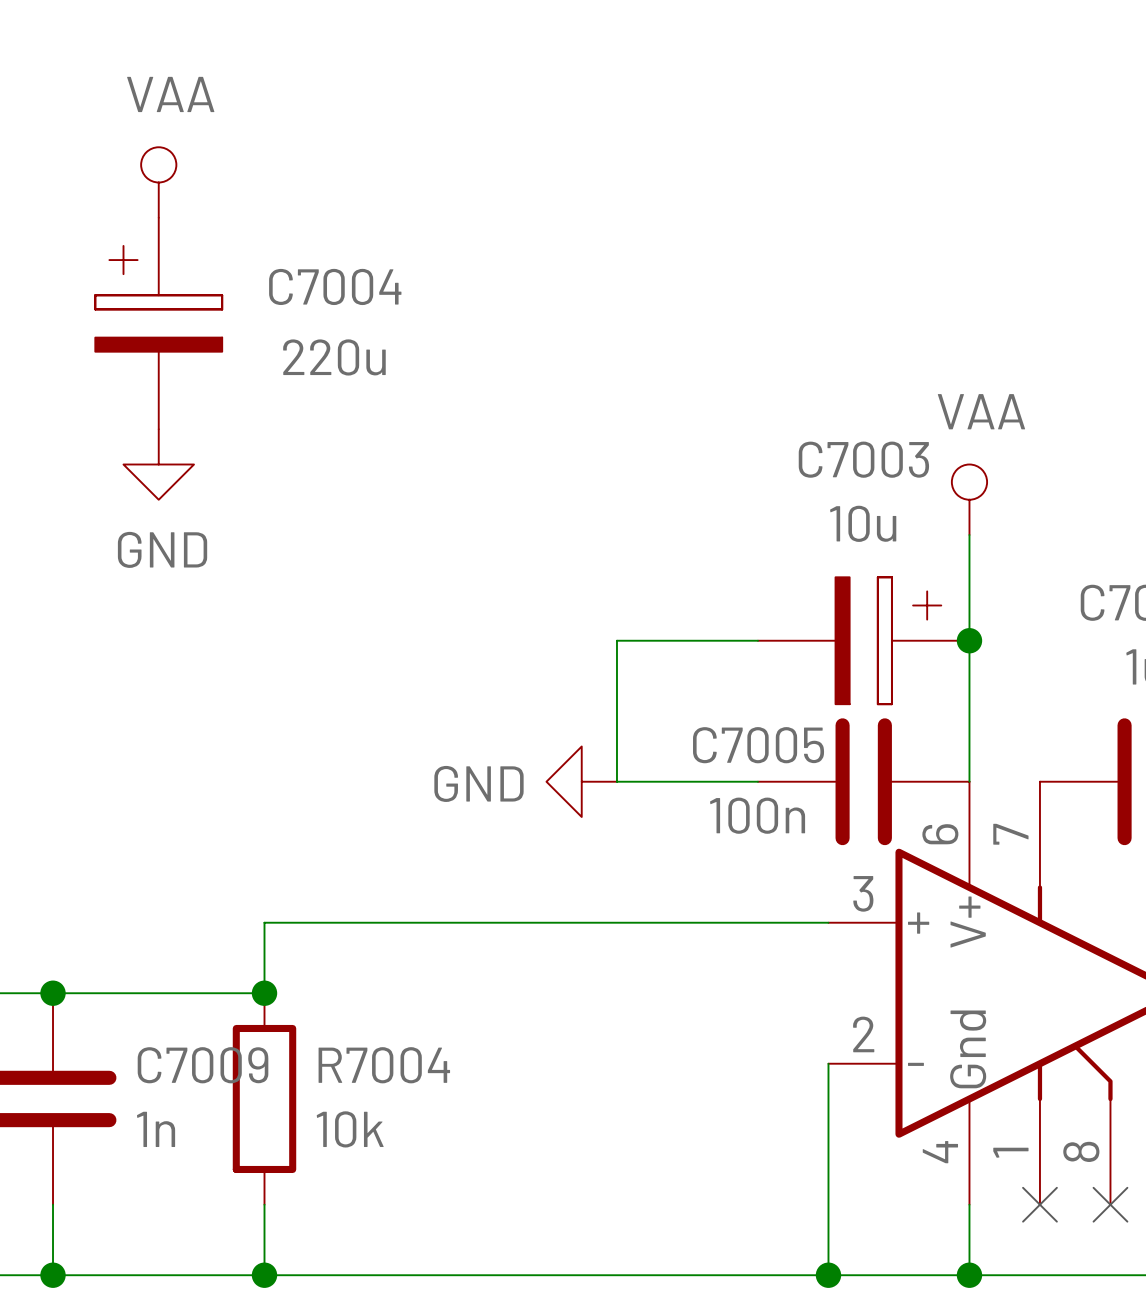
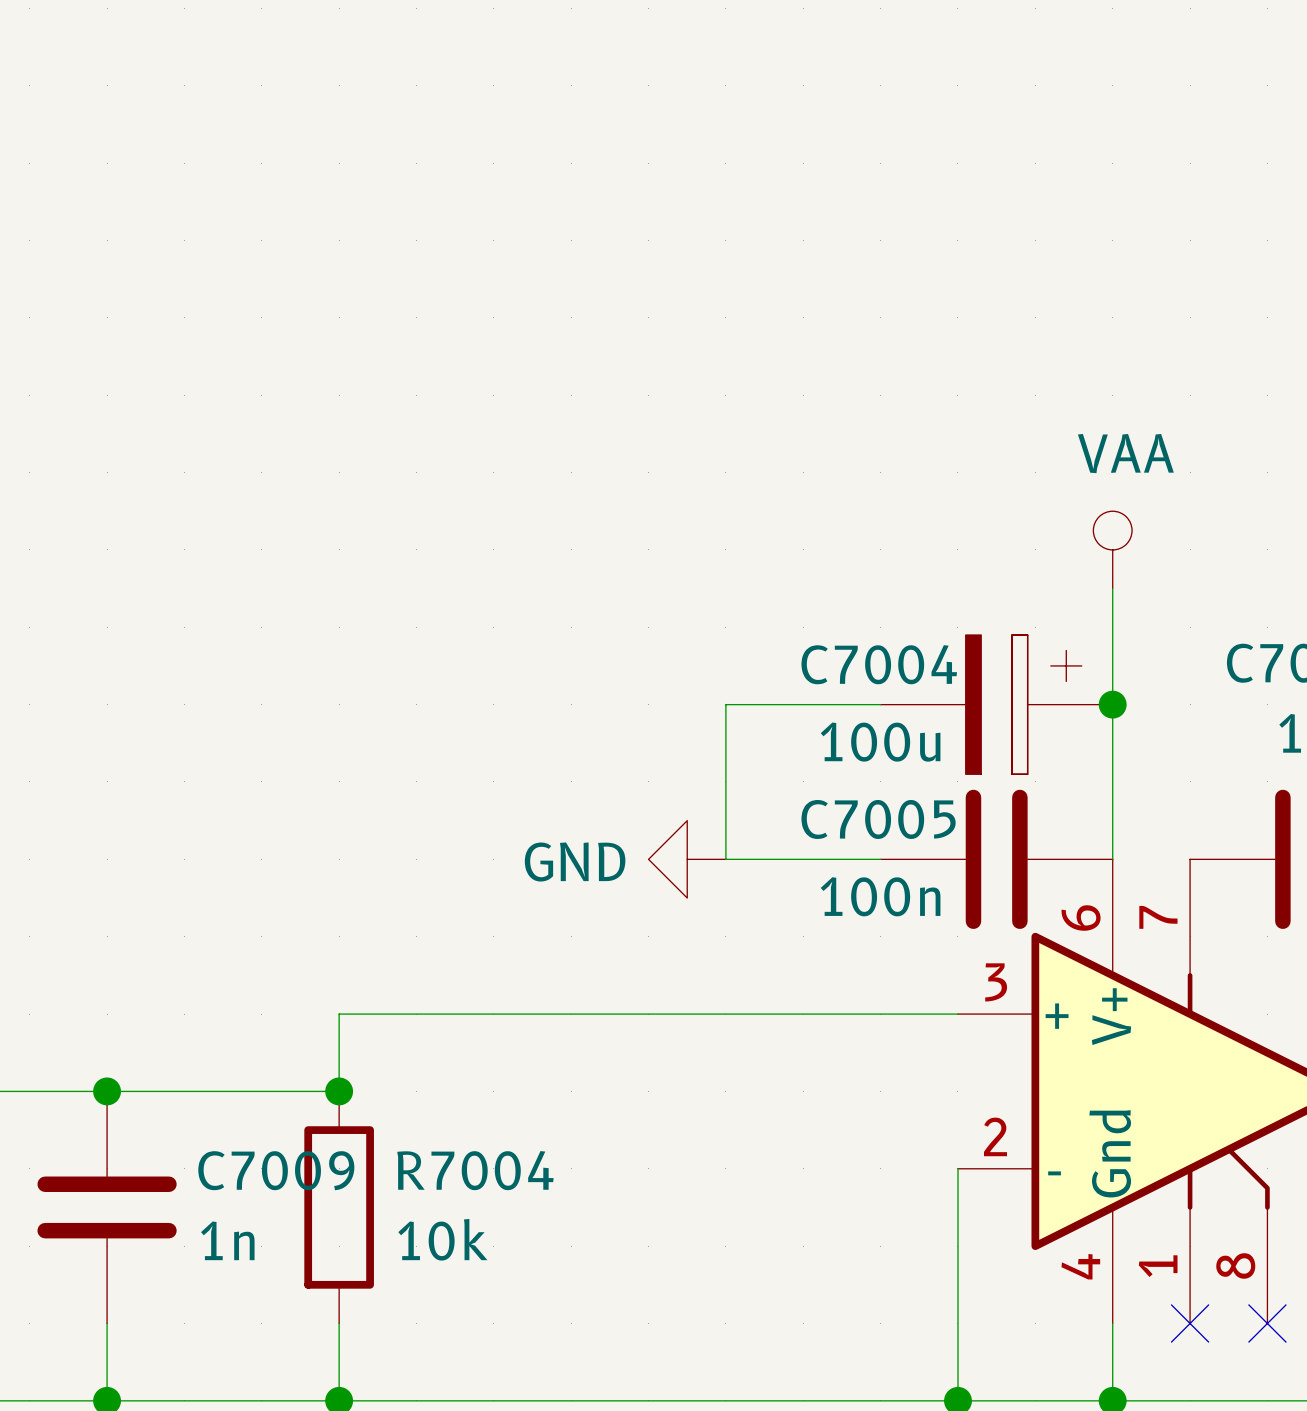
power symbol: VAA (158, 182) -> none
C7004: 220u (158, 323) -> none
C7003 name: C7003 (863, 459) -> C7004 (879, 664)
power symbol: GND (158, 464) -> none
C7003 value: 10u (863, 523) -> 100u (880, 742)

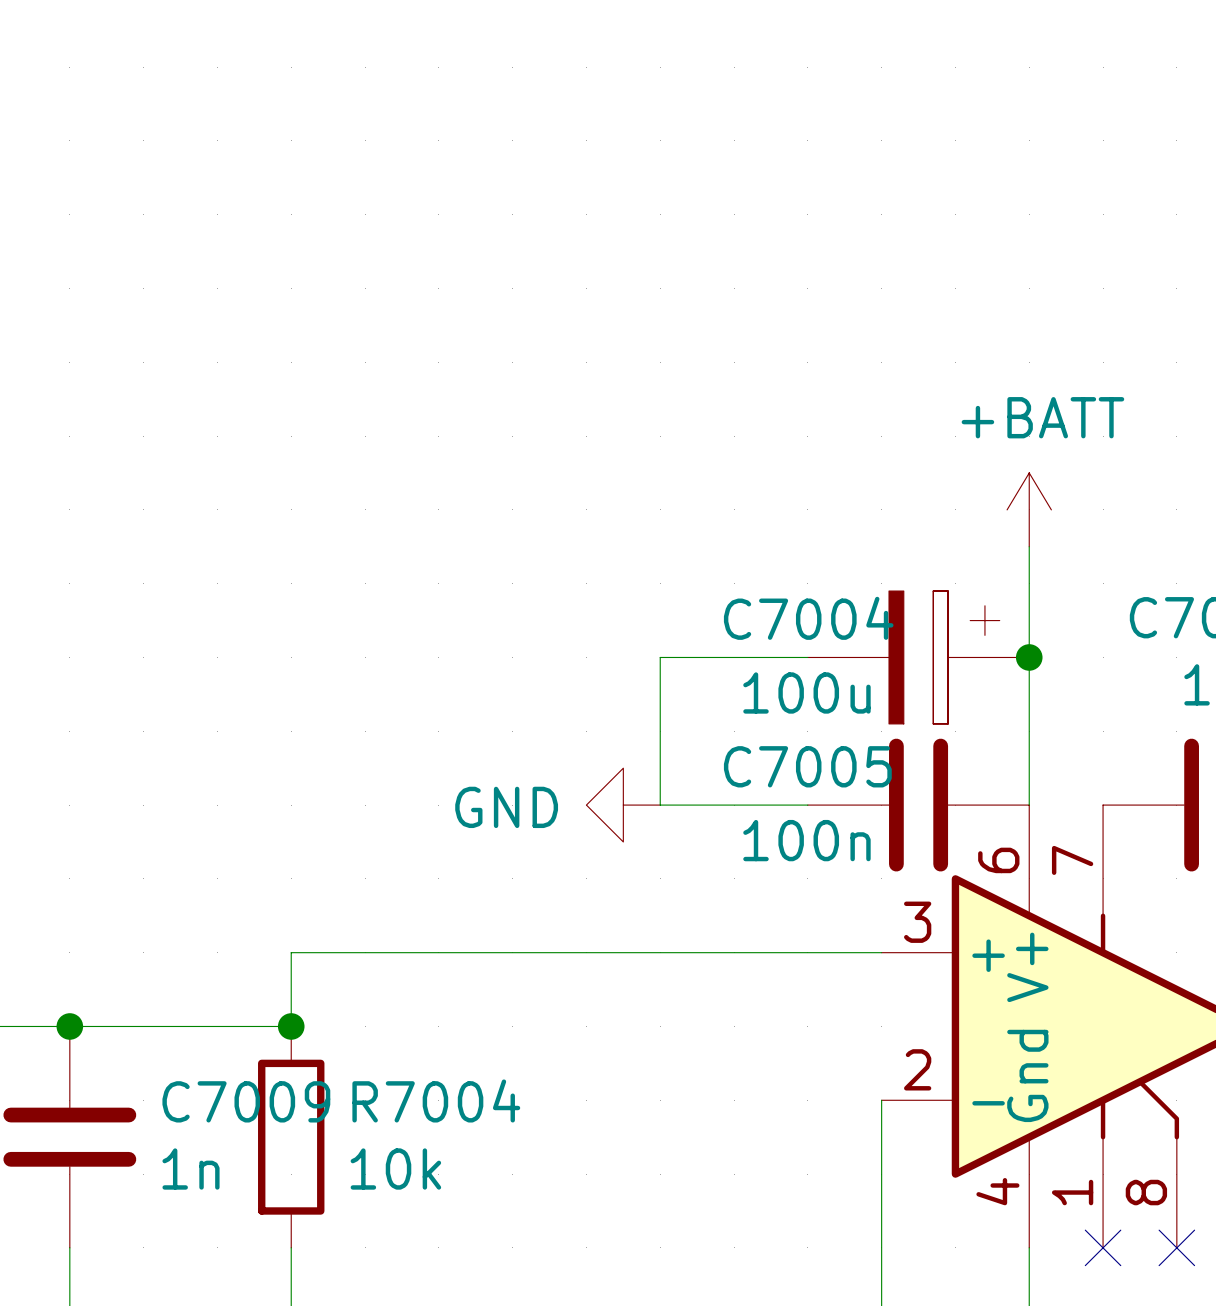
power symbol: VAA (1112, 549) -> +BATT (1029, 509)

